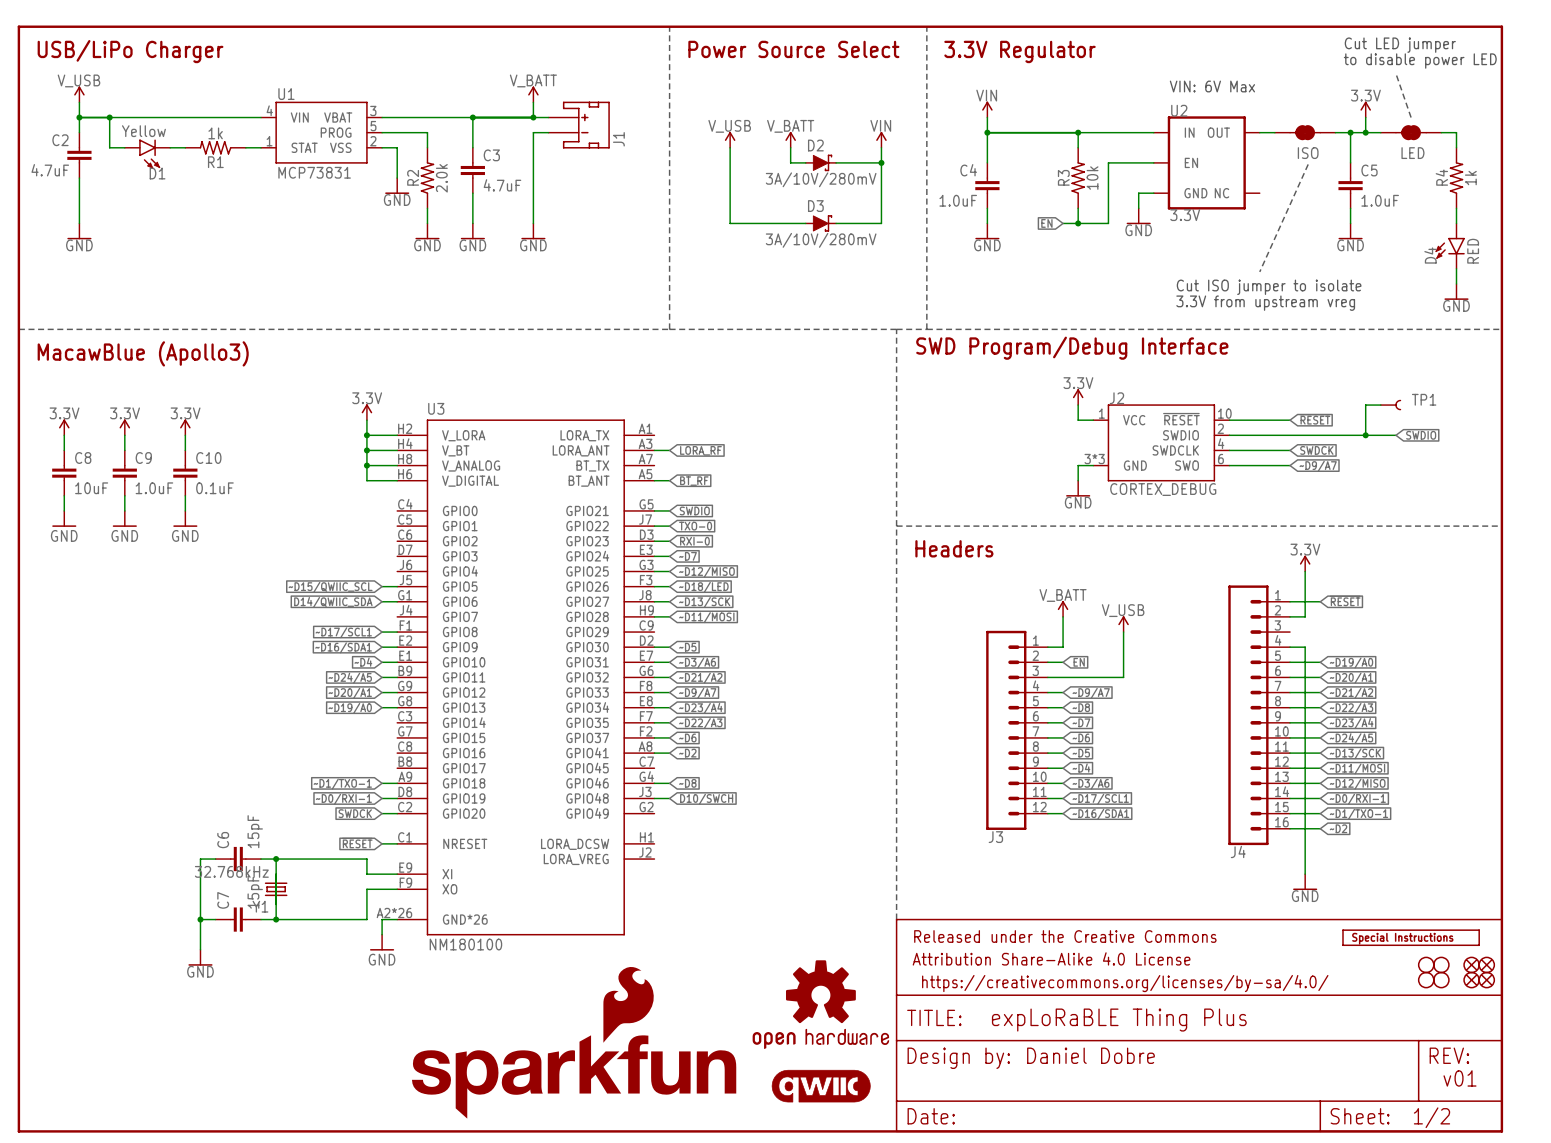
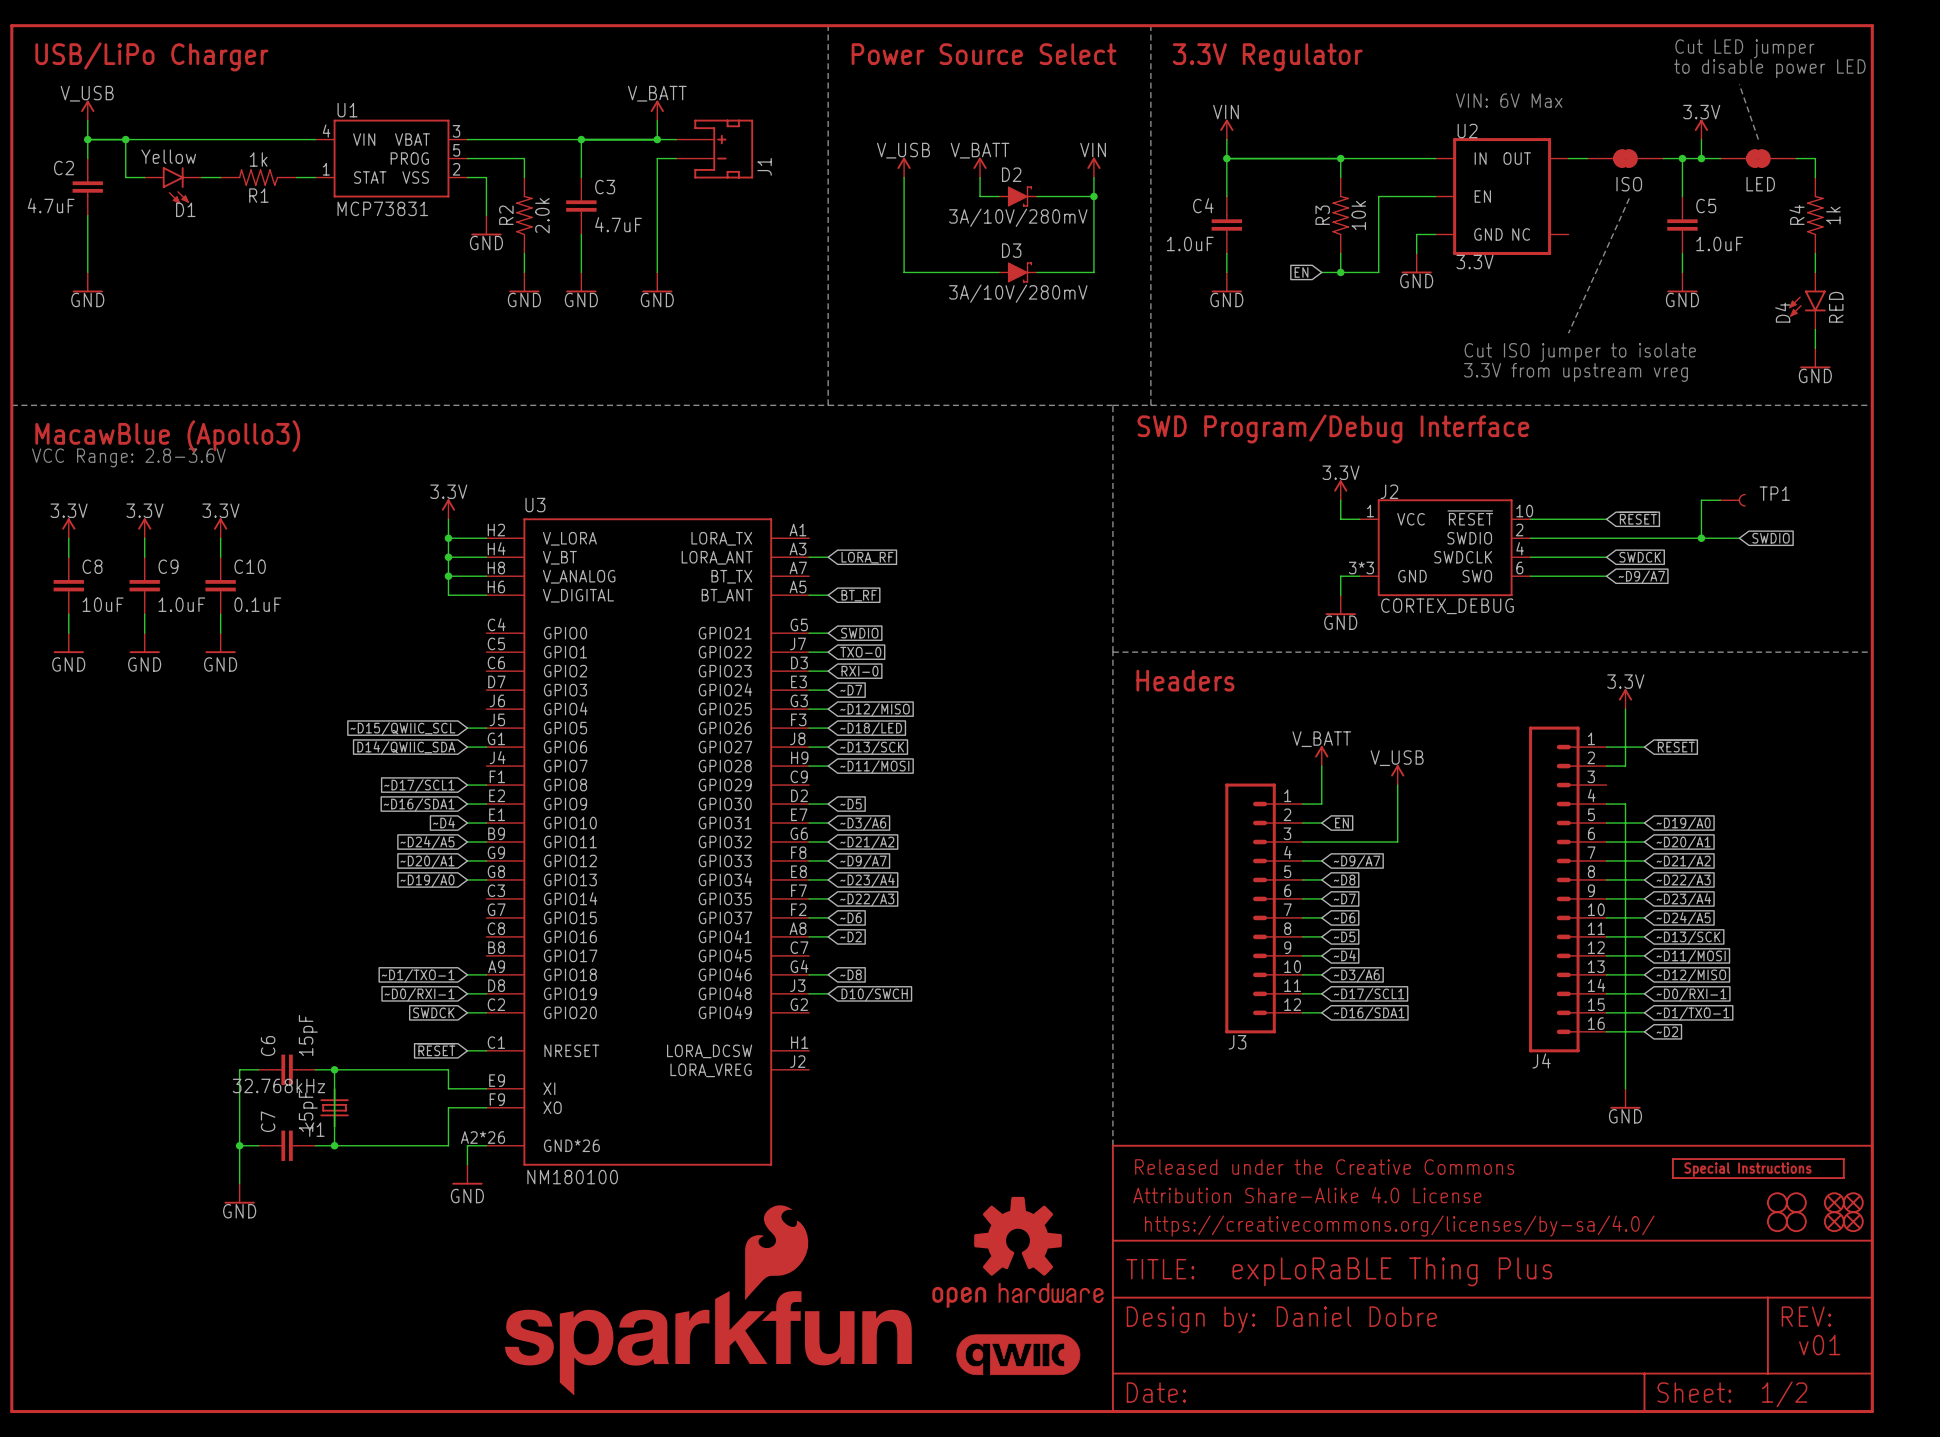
text: none -> VCC Range: 2.8-3.6V (128, 457)

